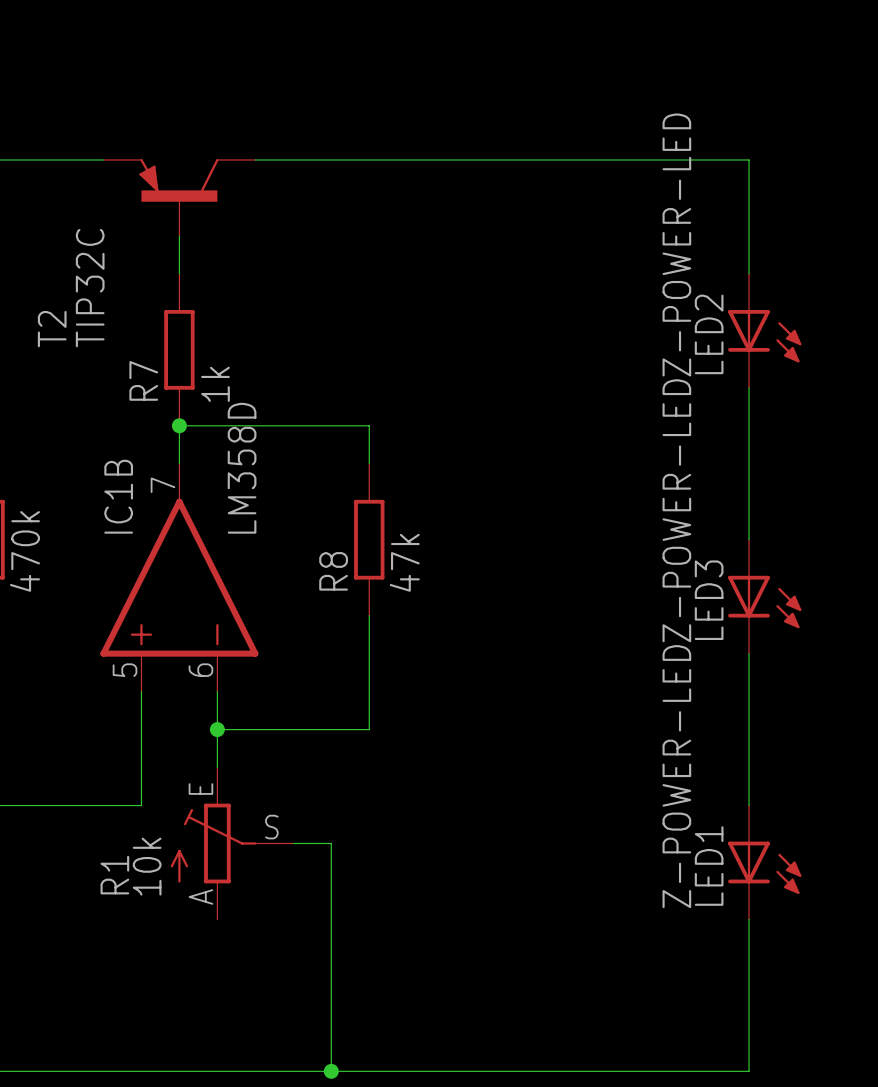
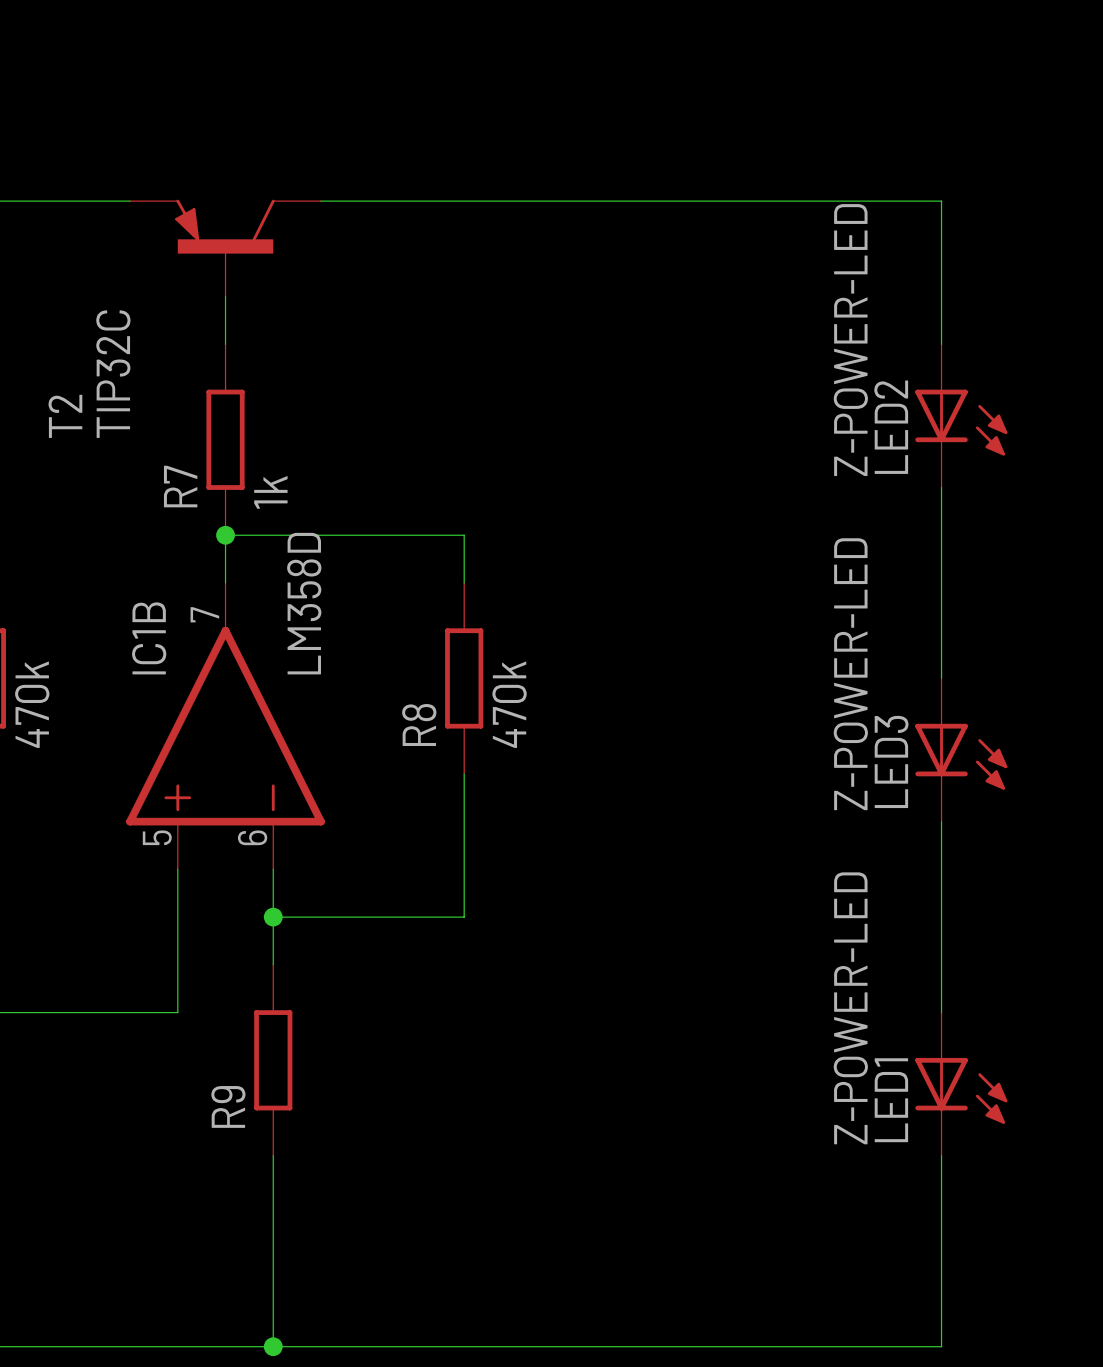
R8 value: 47k (404, 562) -> 470k (509, 704)
R9: none -> (273, 1060)
R1: 10k (232, 843) -> none
wire: (293, 843) (331, 843) (331, 1071) -> none
wire: none -> (273, 1155) (273, 1346)
junction: none -> (273, 1346)
junction: (331, 1071) -> none

